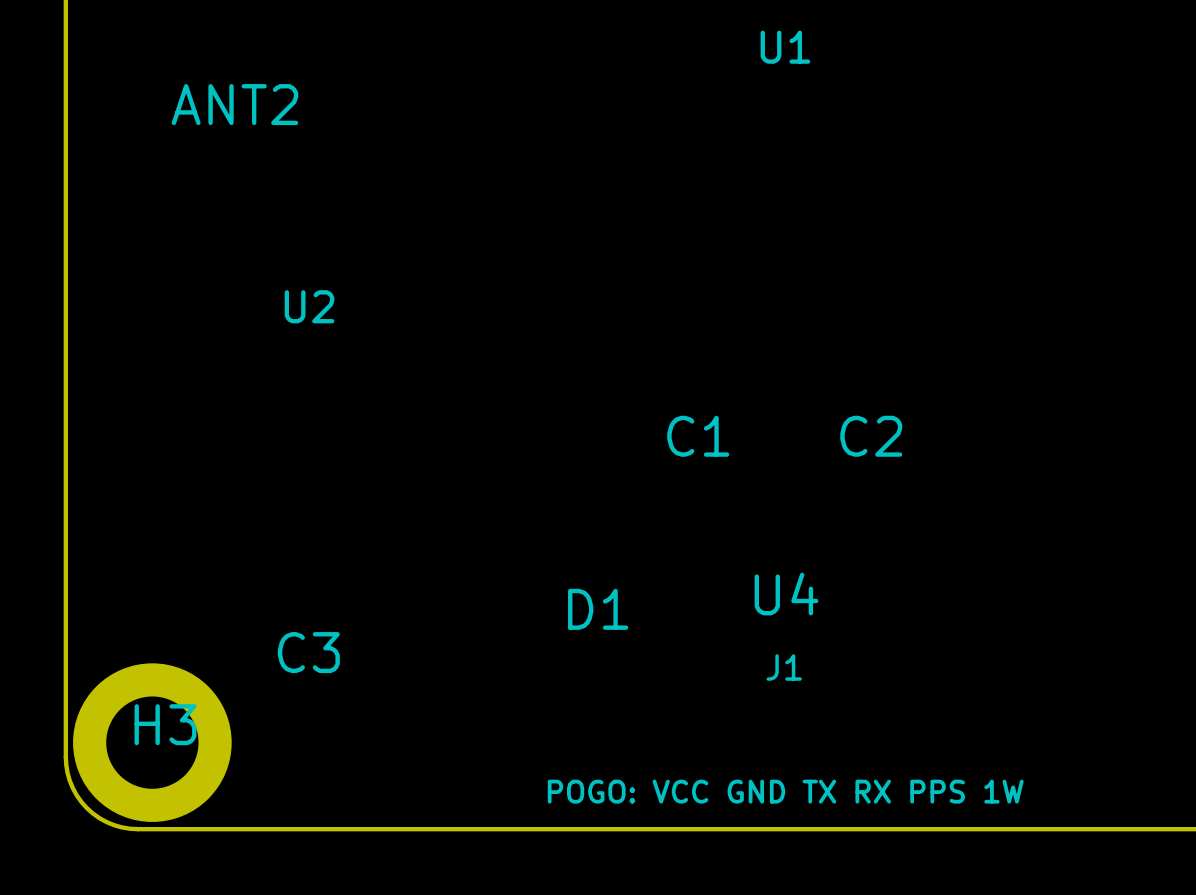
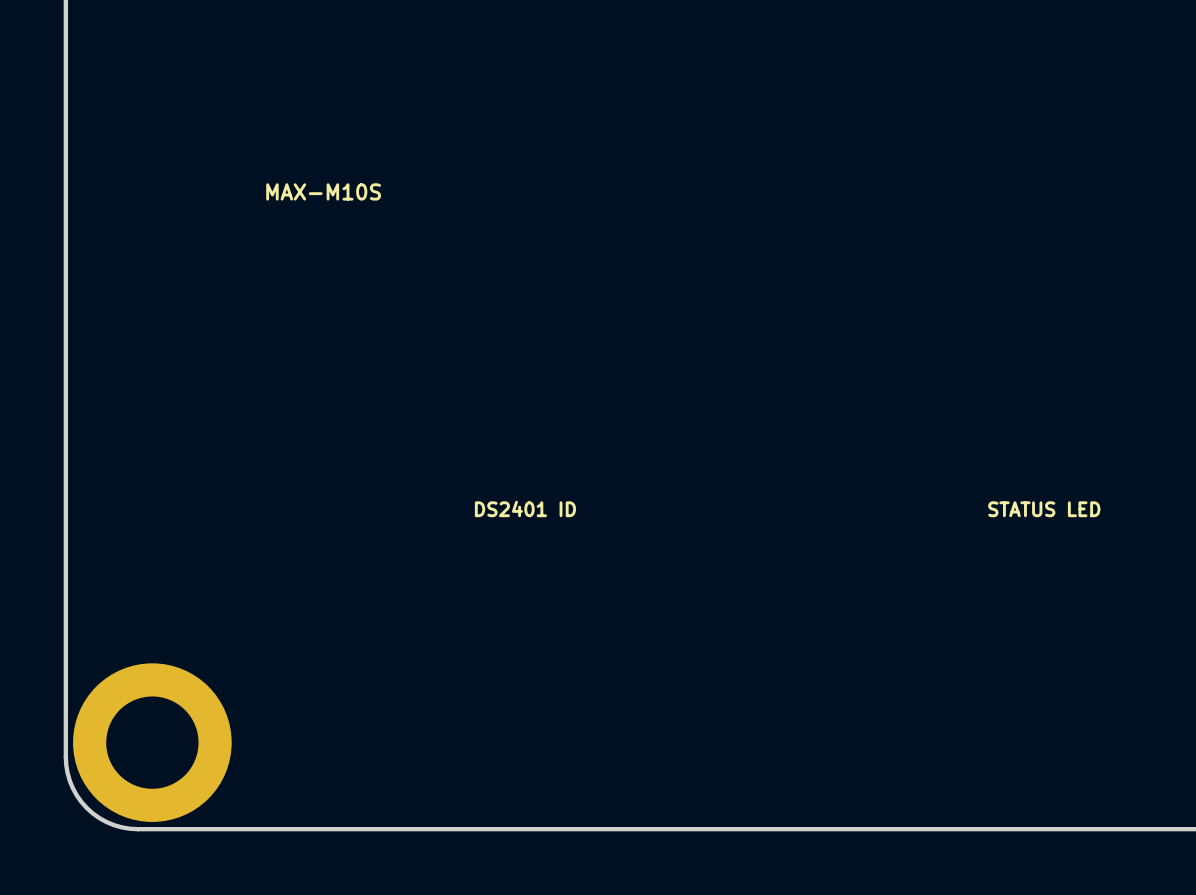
U1: (785, 47) -> none
ANT2: (234, 104) -> none
text: none -> MAX-M10S (323, 191)
U2: (309, 306) -> none
C1: (698, 436) -> none
C2: (871, 436) -> none
text: none -> DS2401 ID (525, 508)
text: none -> STATUS LED (1044, 509)
U4: (786, 594) -> none
D1: (598, 609) -> none
C3: (308, 652) -> none
J1: (784, 667) -> none
H3: (165, 724) -> none
text: POGO: VCC GND TX RX PPS 1W (785, 791) -> none

